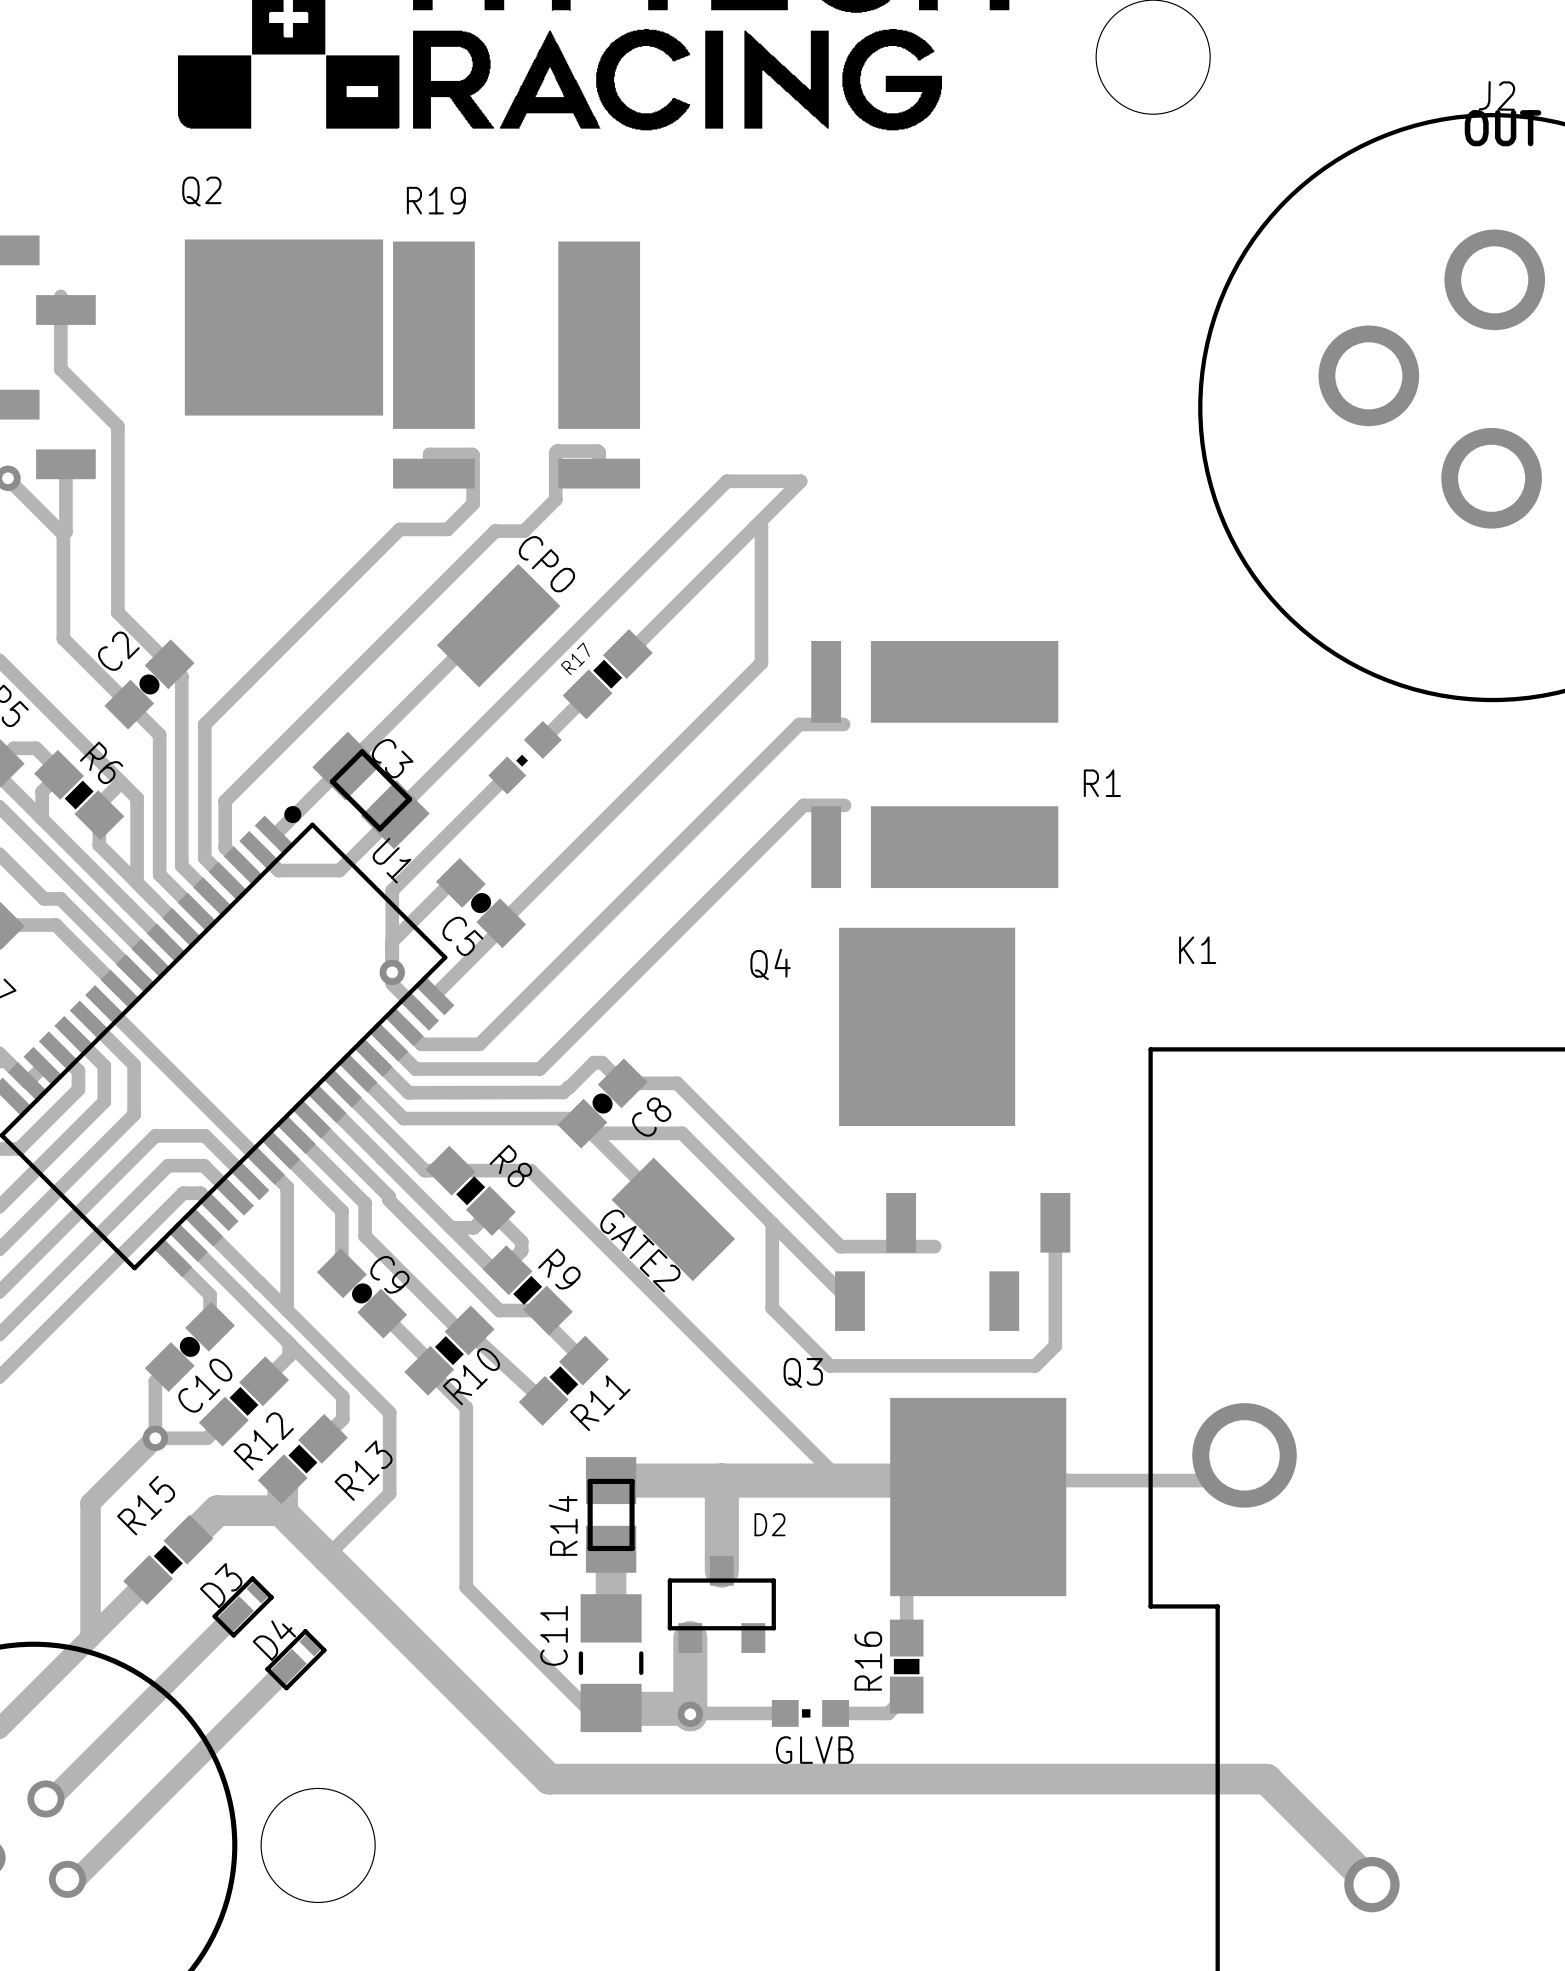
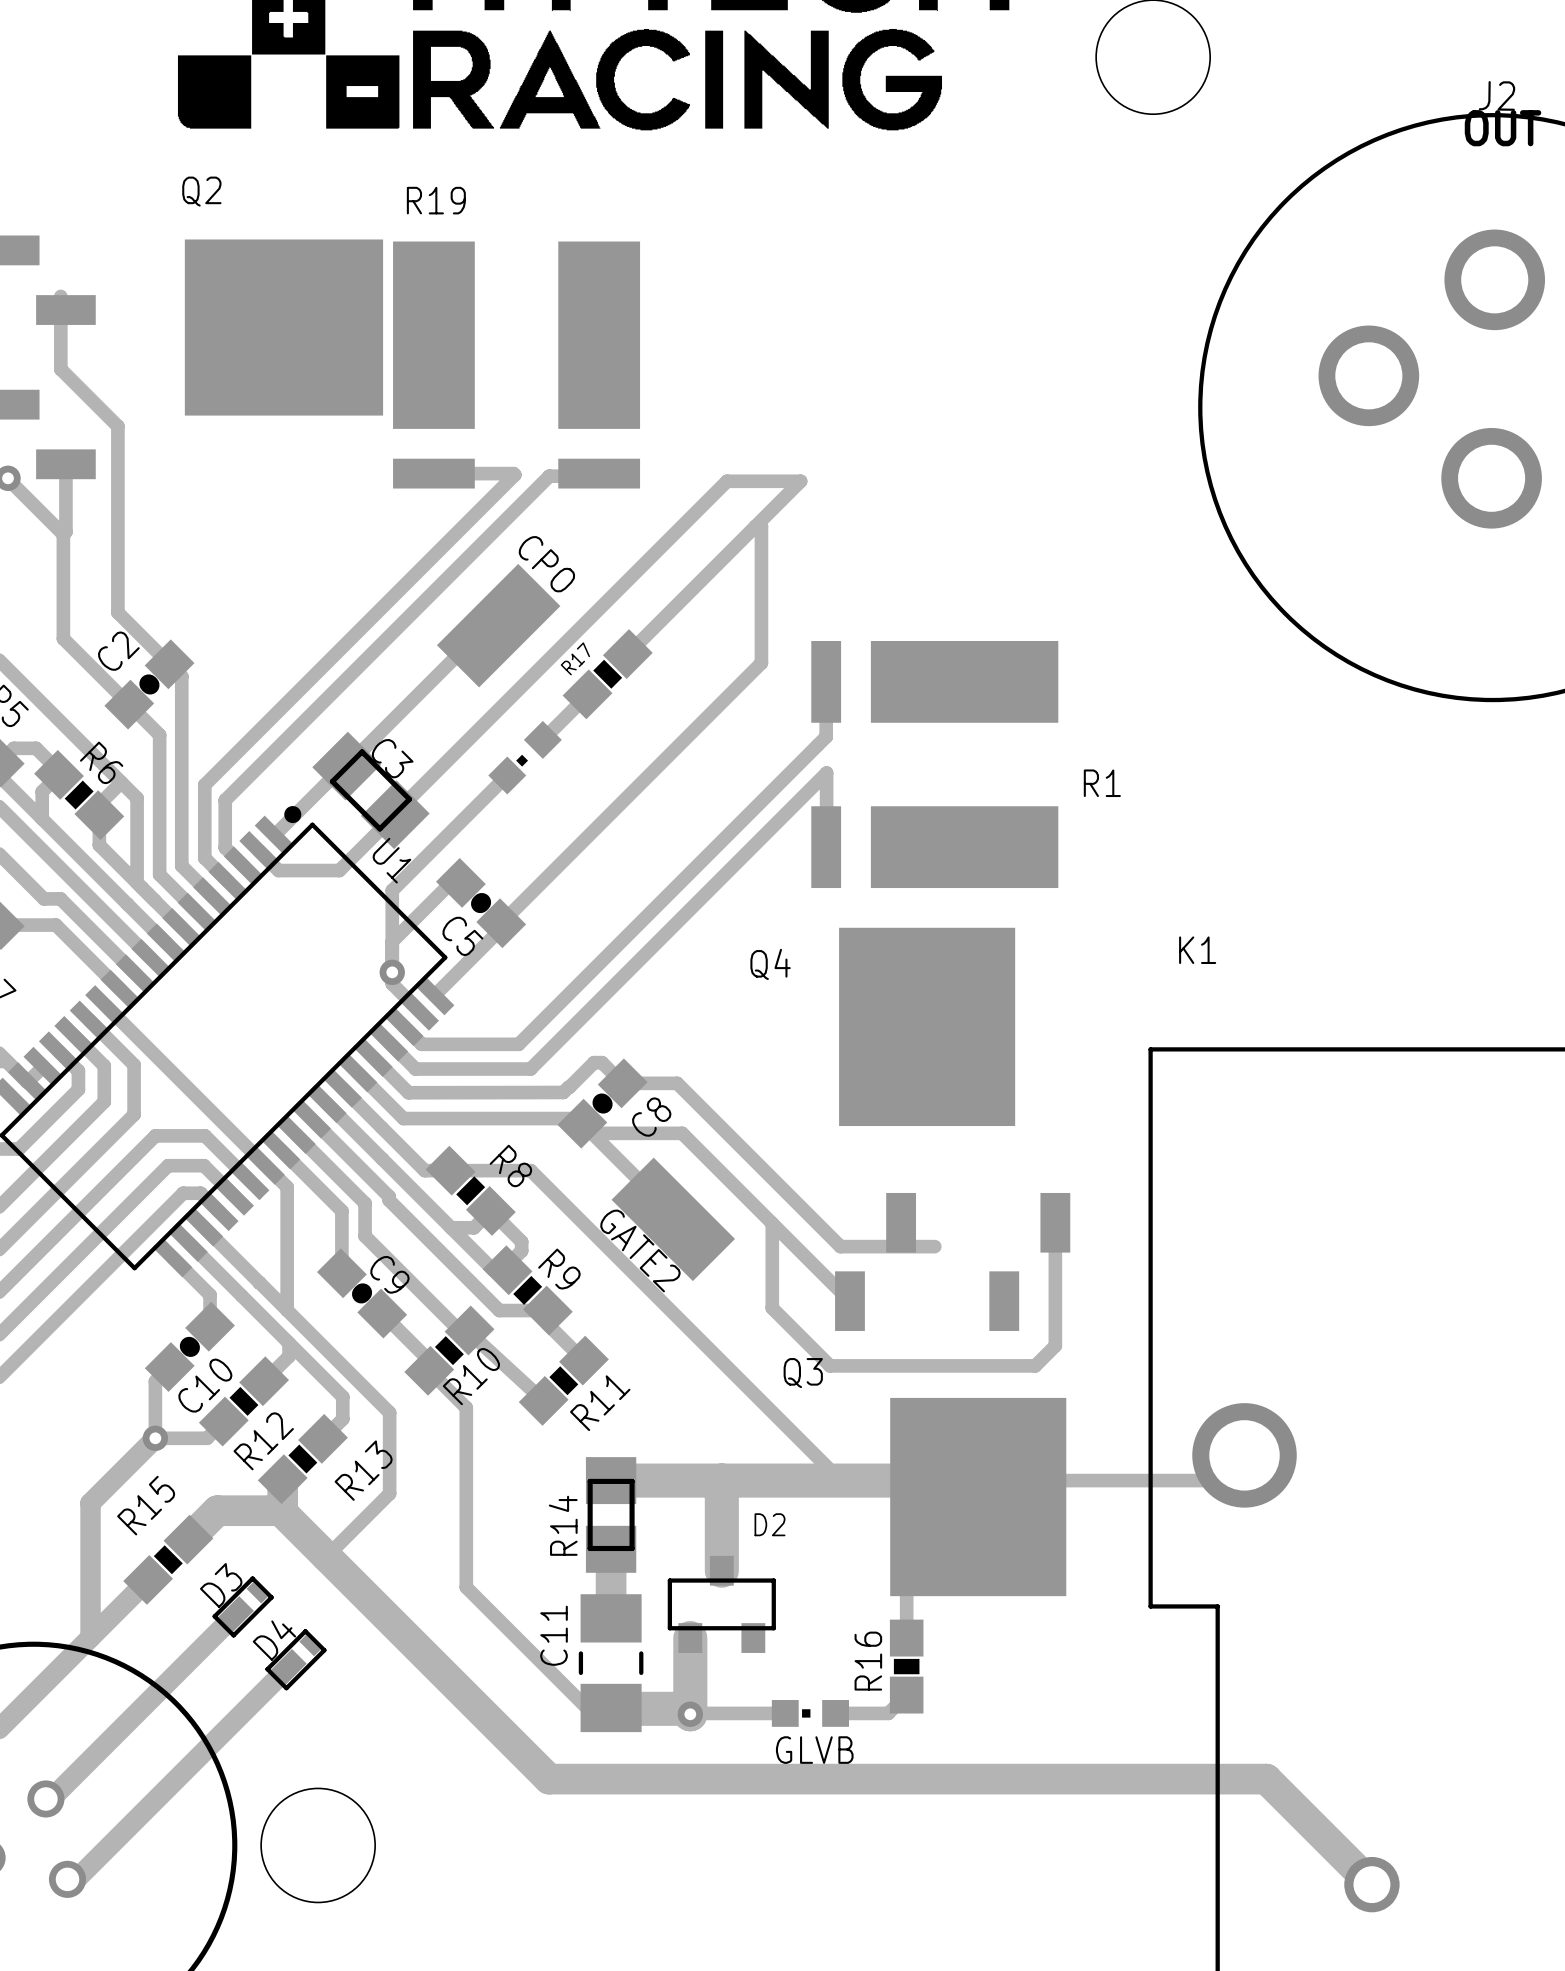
track: (433, 473) (429, 469) (429, 454) (472, 454) (473, 503) (447, 529) (399, 529) (204, 724) (204, 784) -> (433, 473) (514, 474) (204, 784)
track: (599, 473) (599, 452) (597, 451) (557, 451) (555, 452) (555, 499) (524, 531) (495, 531) (225, 801) -> (576, 476) (549, 476) (225, 801)
track: (843, 724) (799, 724) (479, 1044) -> (826, 681) (826, 736) (518, 1044) (479, 1044)
track: (844, 805) (803, 805) (539, 1069) (530, 1069) -> (826, 846) (826, 773) (530, 1069)

